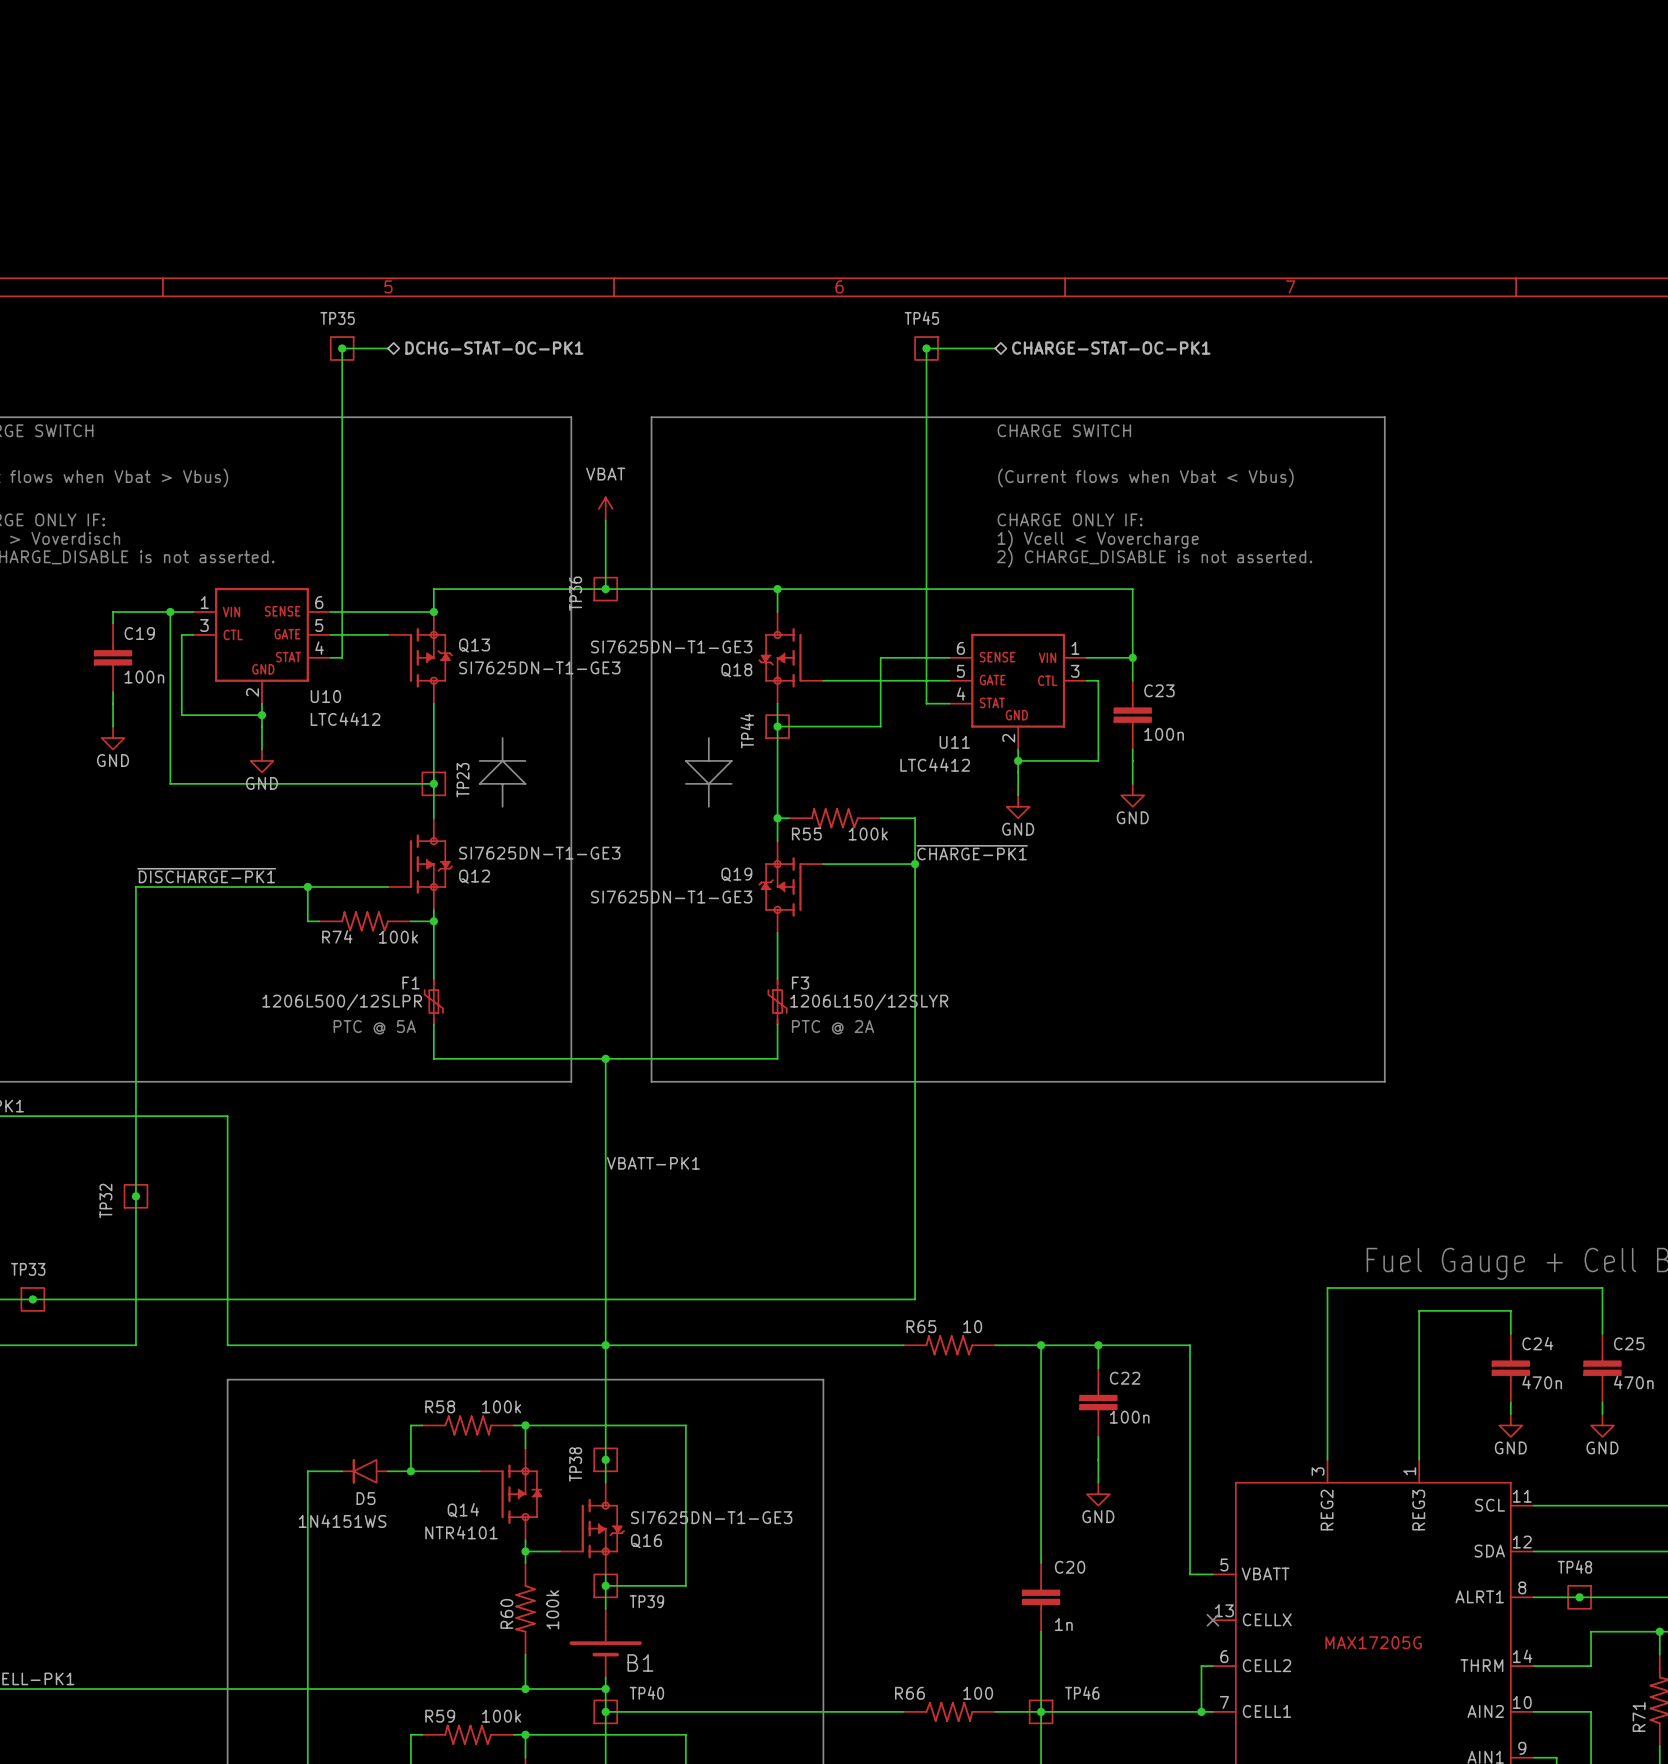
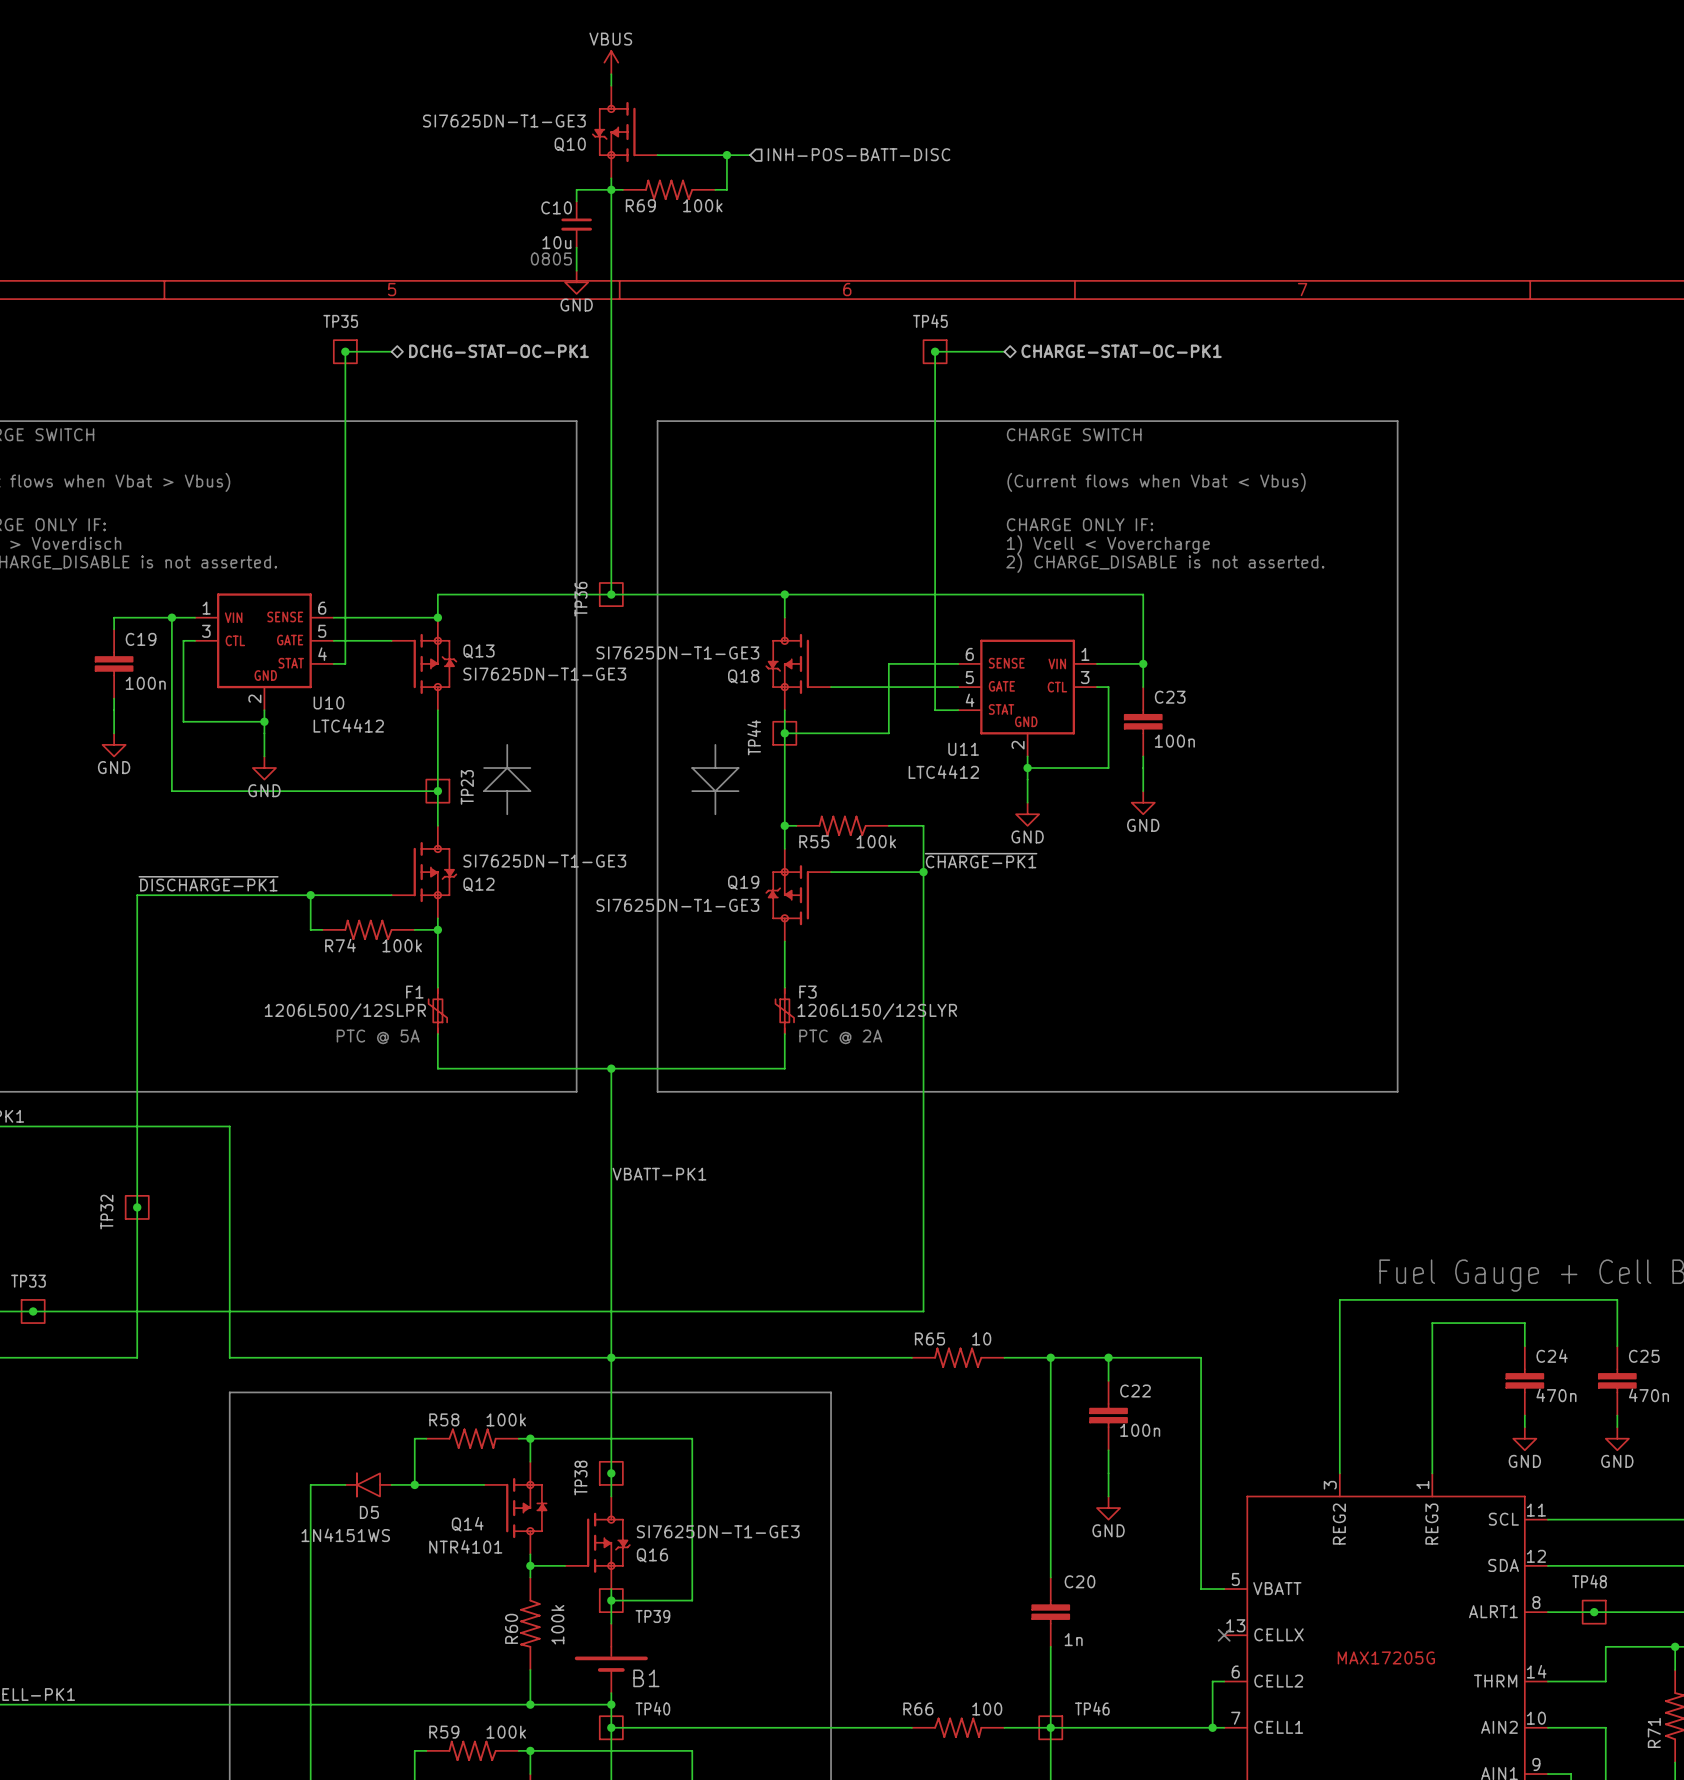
power symbol: none -> VBUS (611, 62)
wire: none -> (611, 74) (611, 85)
Q10: none -> SI7625DN-T1-GE3 (624, 132)
wire: none -> (657, 155) (750, 155)
wire: none -> (726, 155) (726, 189) (715, 189)
junction: none -> (726, 155)
hierarchical label: none -> INH-POS-BATT-DISC (859, 154)
wire: none -> (611, 178) (611, 525)
junction: none -> (611, 189)
wire: none -> (622, 189) (576, 189) (576, 201)
R69: none -> 100k (669, 189)
C10: none -> 10u (576, 224)
wire: none -> (576, 247) (576, 270)
text: none -> 0805 (551, 259)
power symbol: none -> GND (576, 282)
power symbol: VBAT (605, 508) -> none

